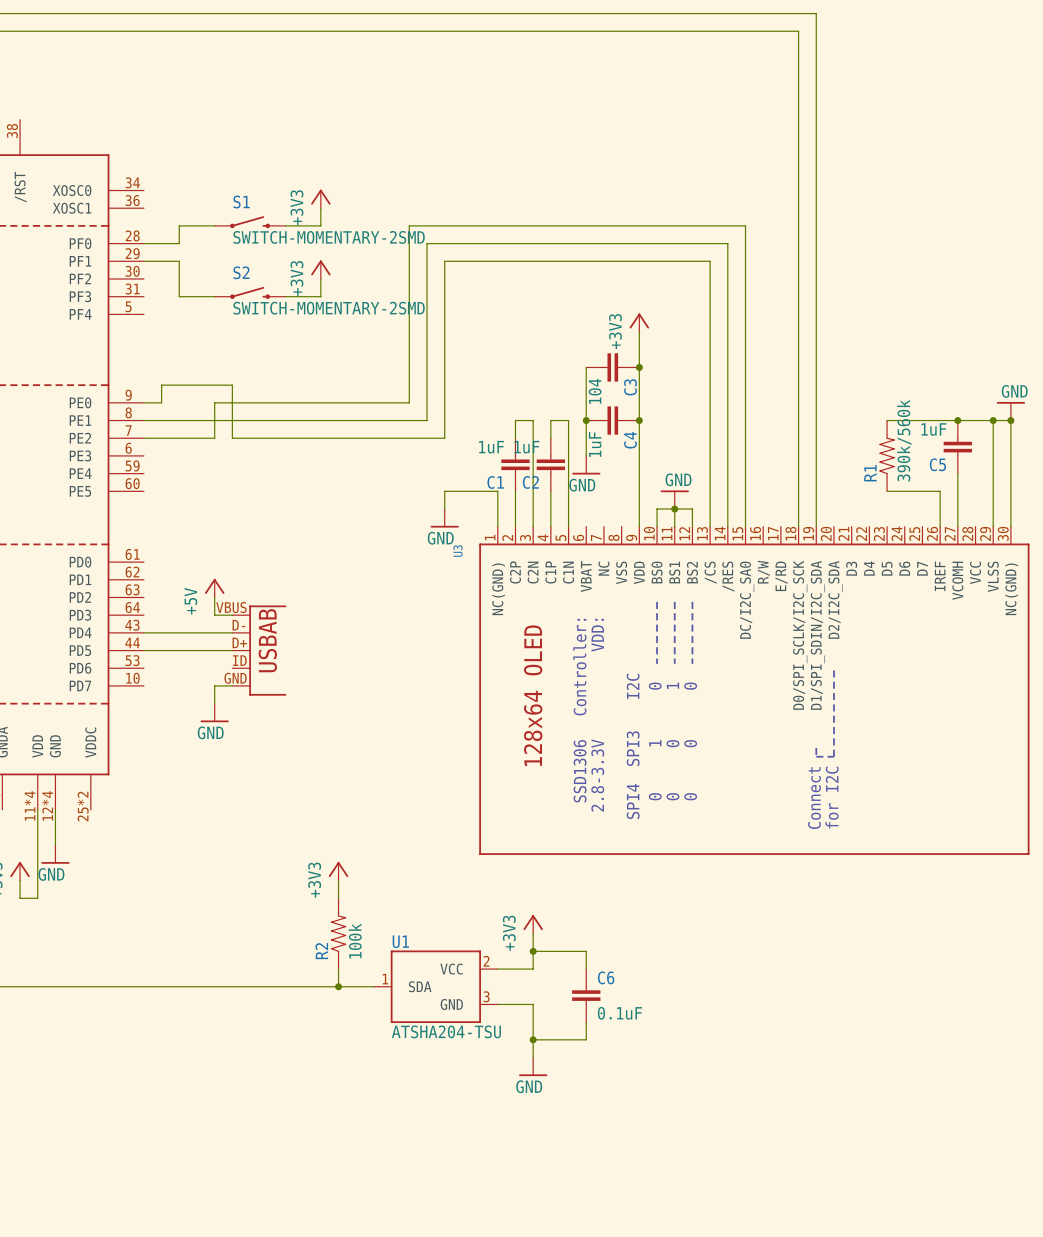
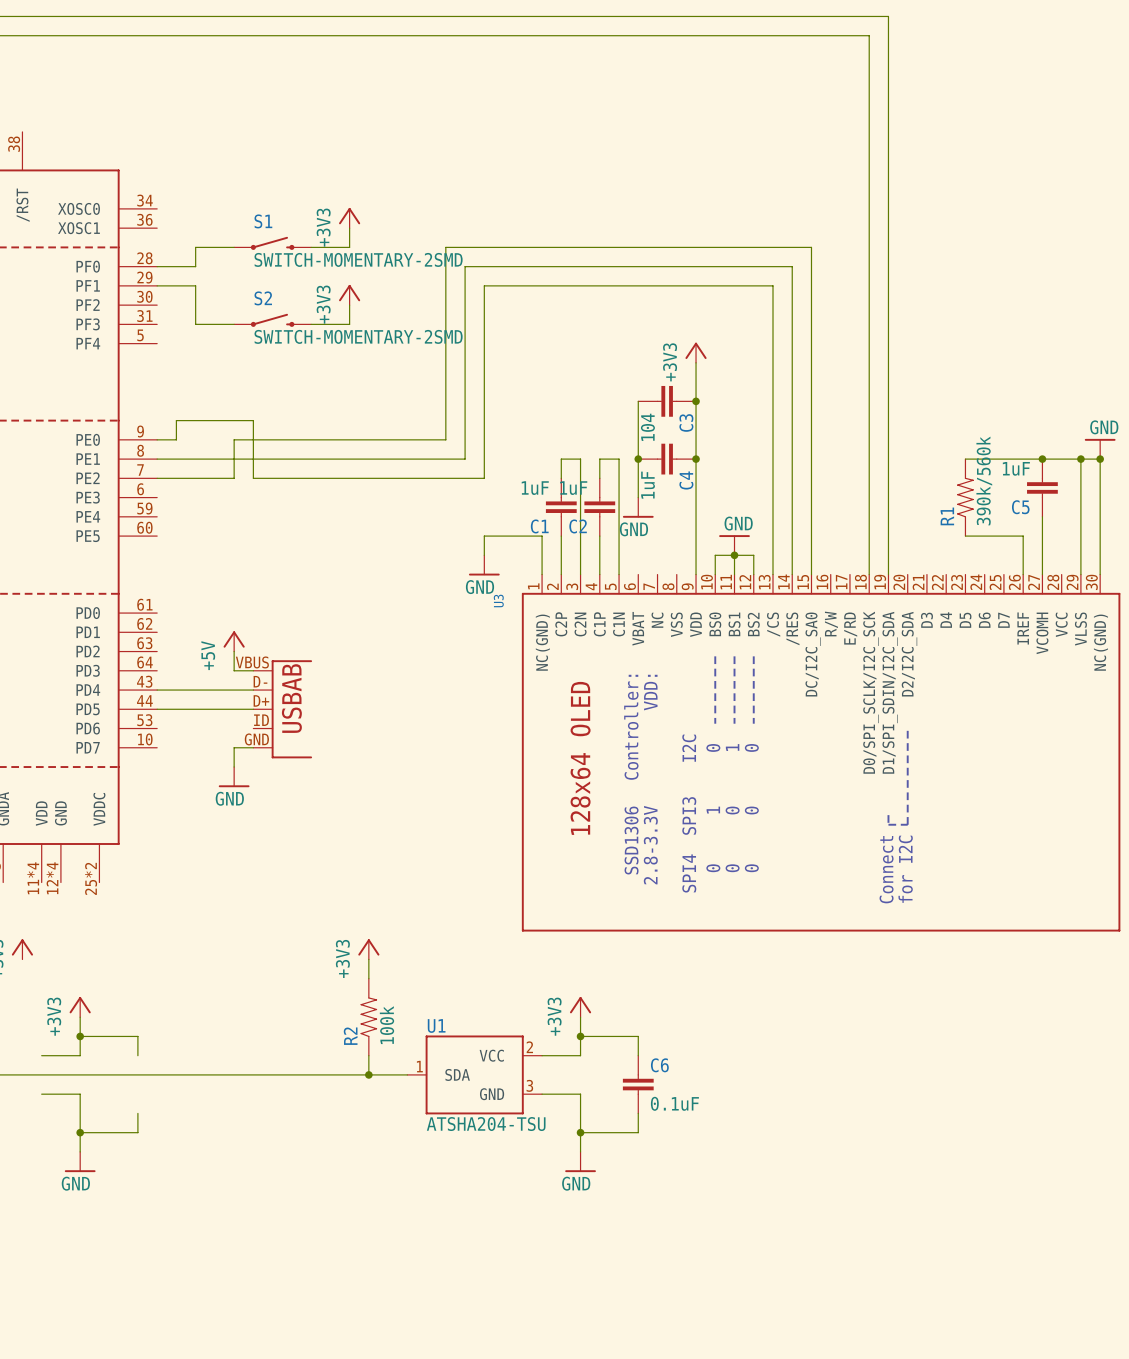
wire: (37, 809) (37, 898) (20, 898) (20, 880) -> none
wire: (55, 809) (55, 845) -> none
power symbol: GND (55, 854) -> none
power symbol: none -> +3V3 (80, 1007)
wire: none -> (80, 1017) (80, 1055) (41, 1055)
wire: none -> (80, 1036) (137, 1036) (137, 1055)
junction: none -> (80, 1036)
wire: none -> (41, 1094) (80, 1094) (80, 1151)
wire: none -> (137, 1113) (137, 1132) (80, 1132)
junction: none -> (80, 1132)
power symbol: none -> GND (80, 1162)

